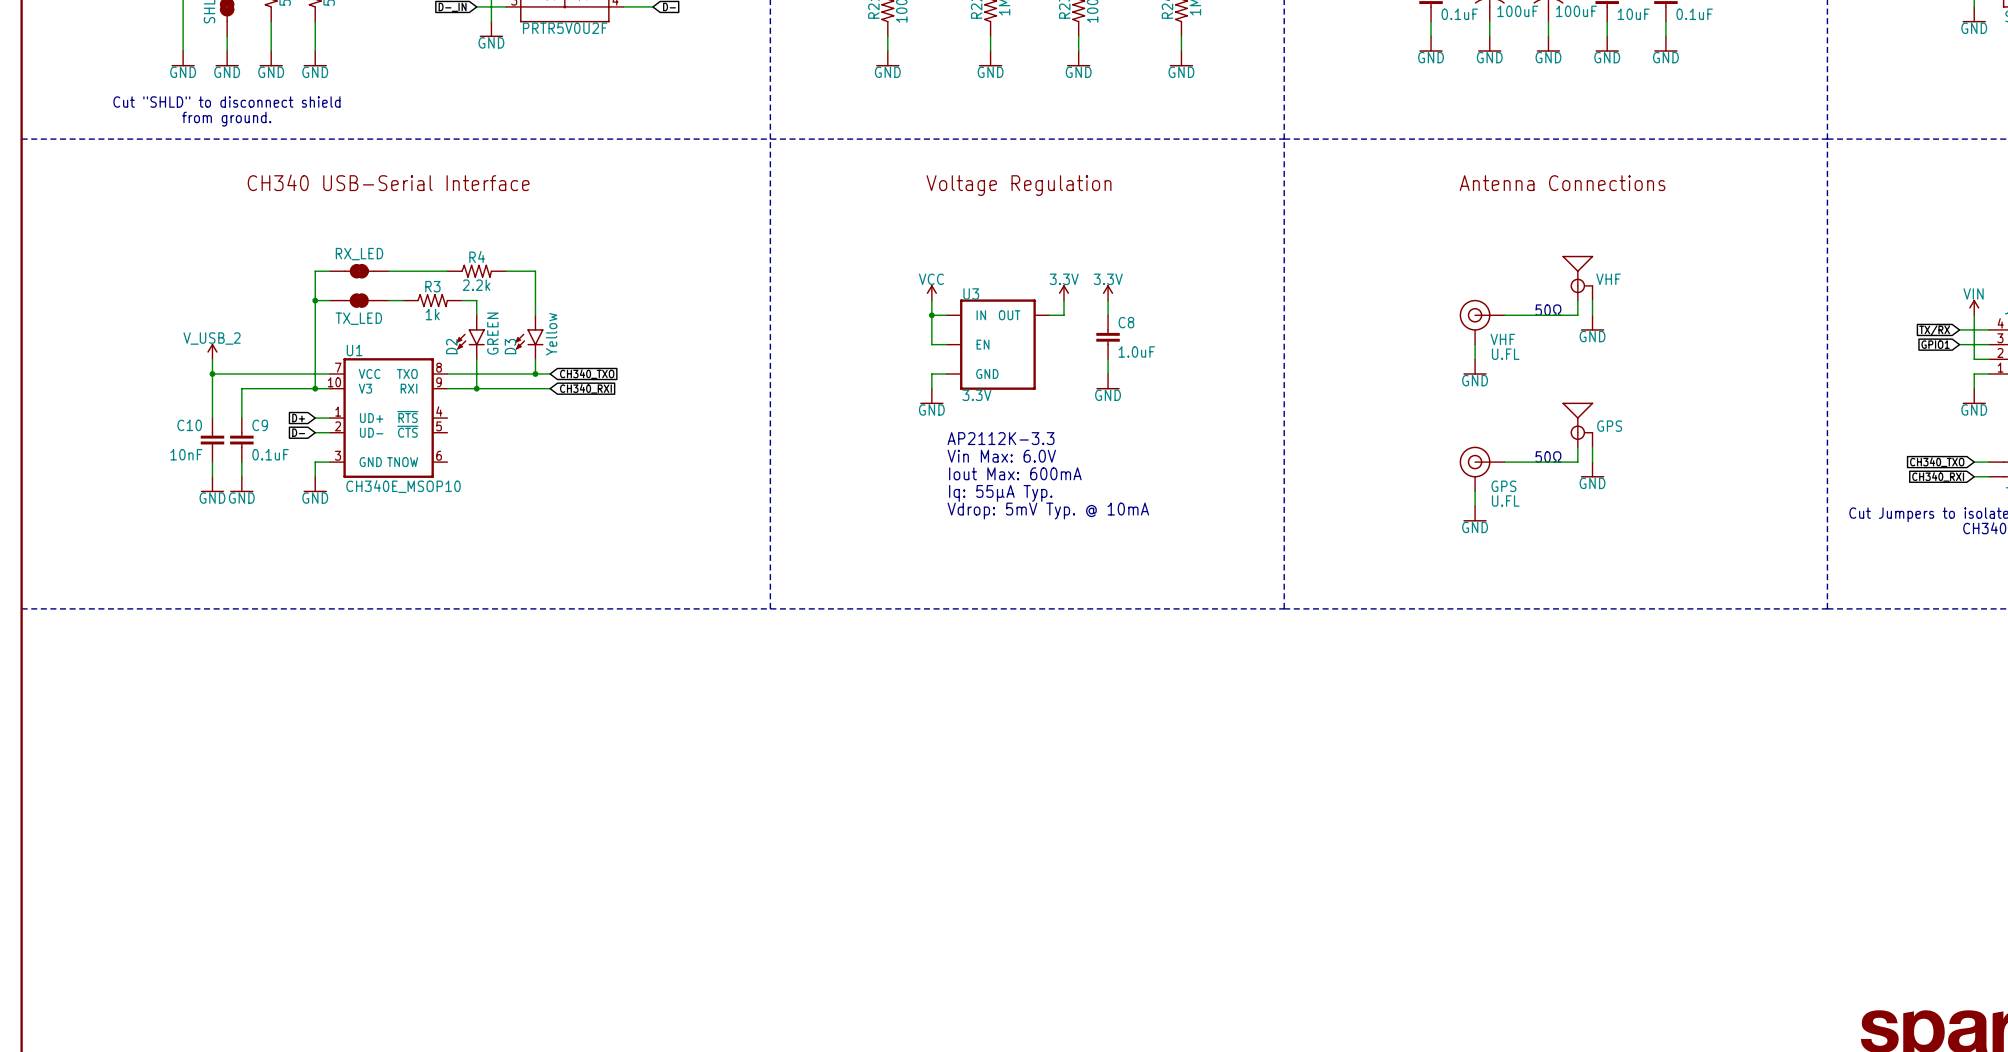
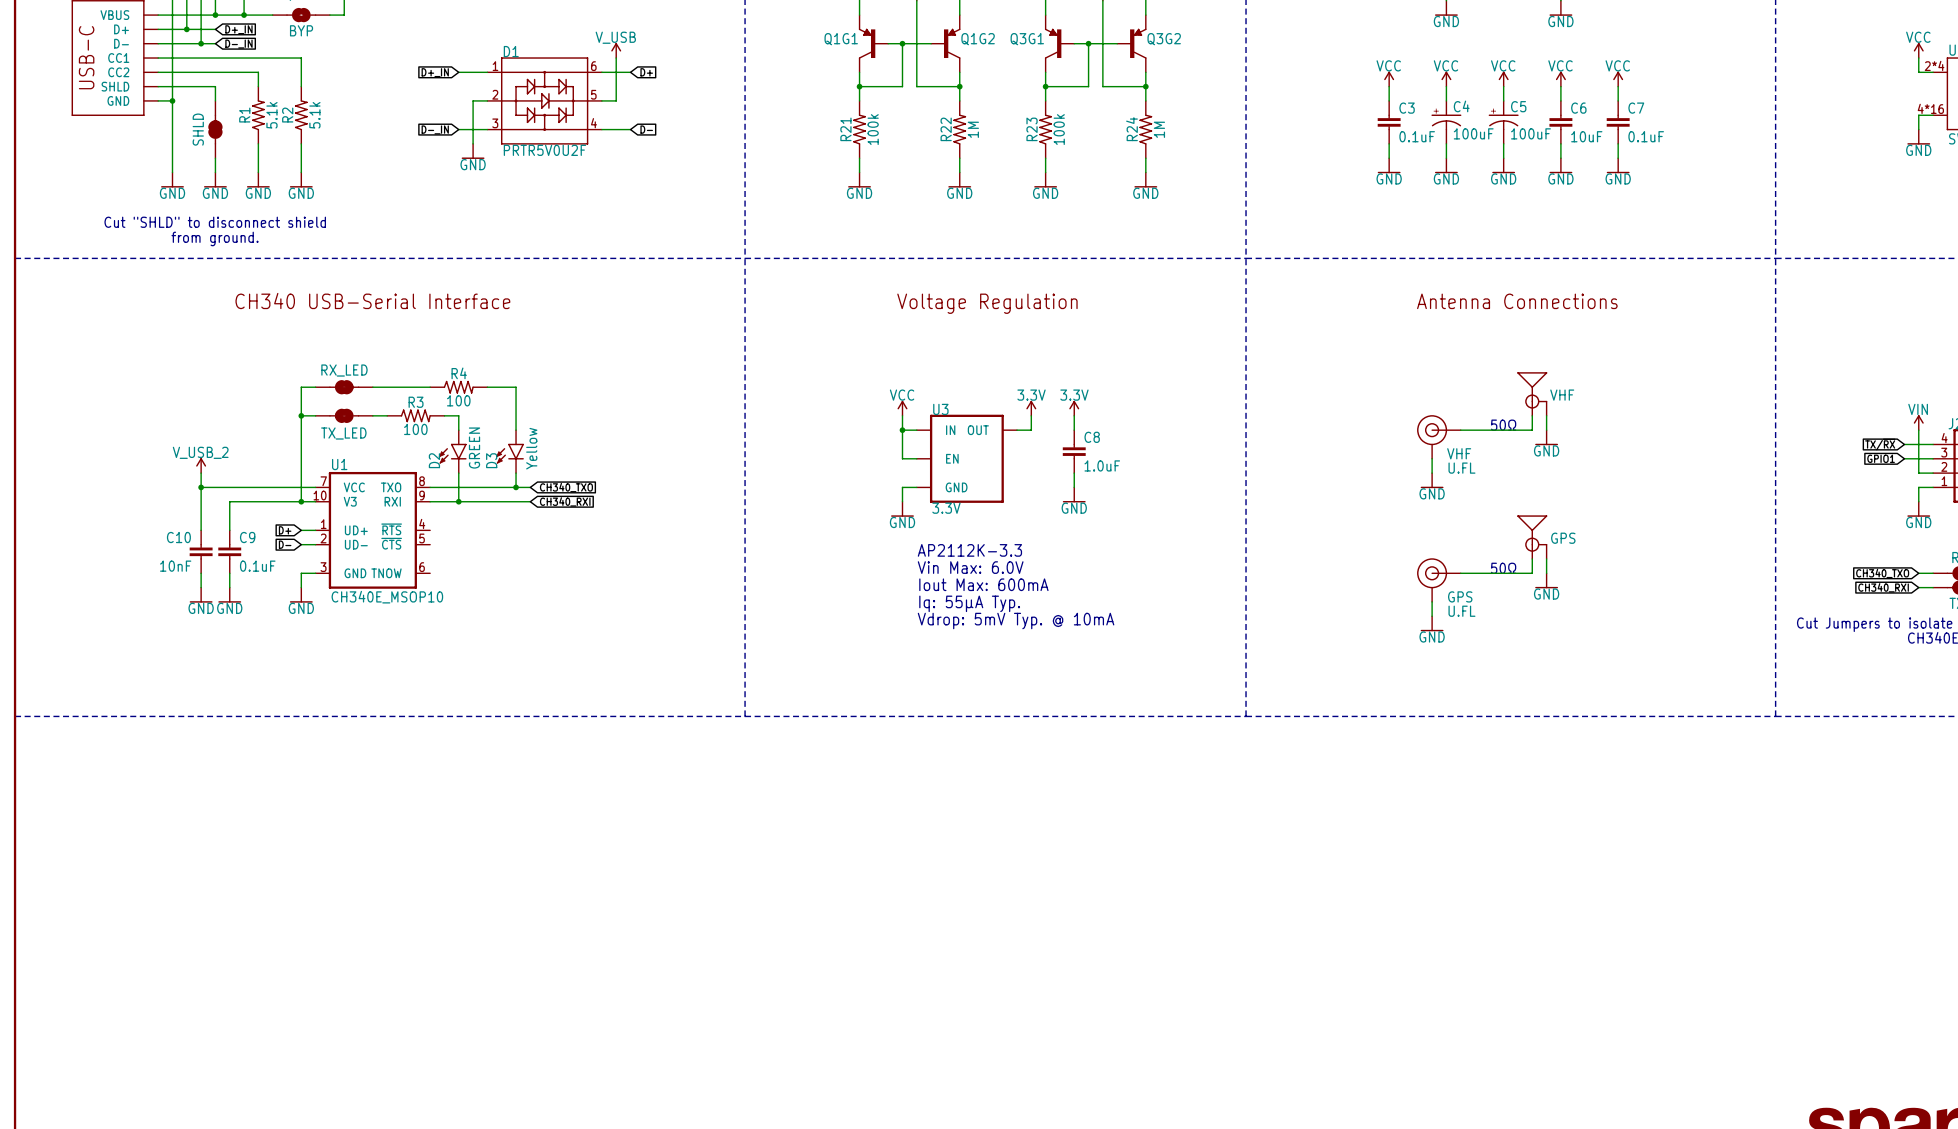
R4 value: 2.2k (476, 285) -> 100 (458, 400)
R3 value: 1k (432, 314) -> 100 (415, 429)

